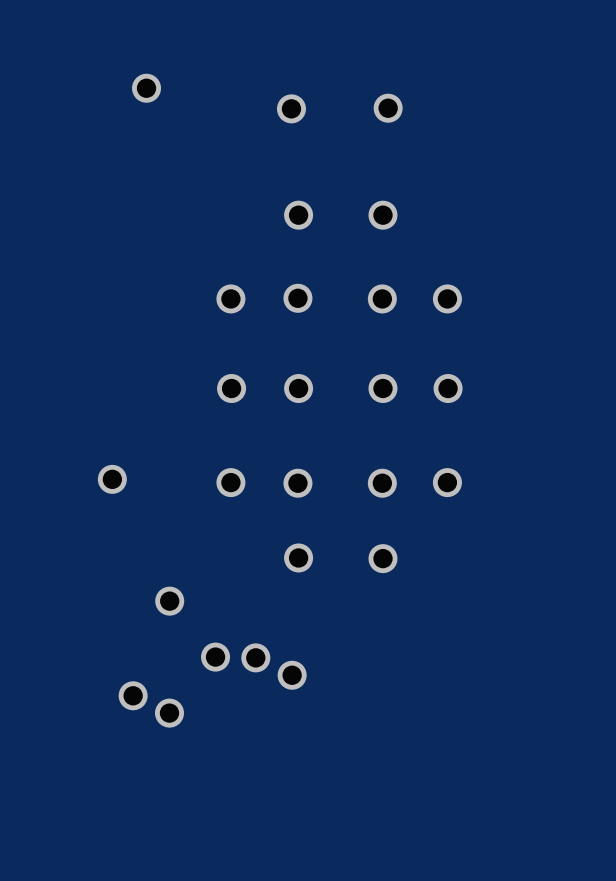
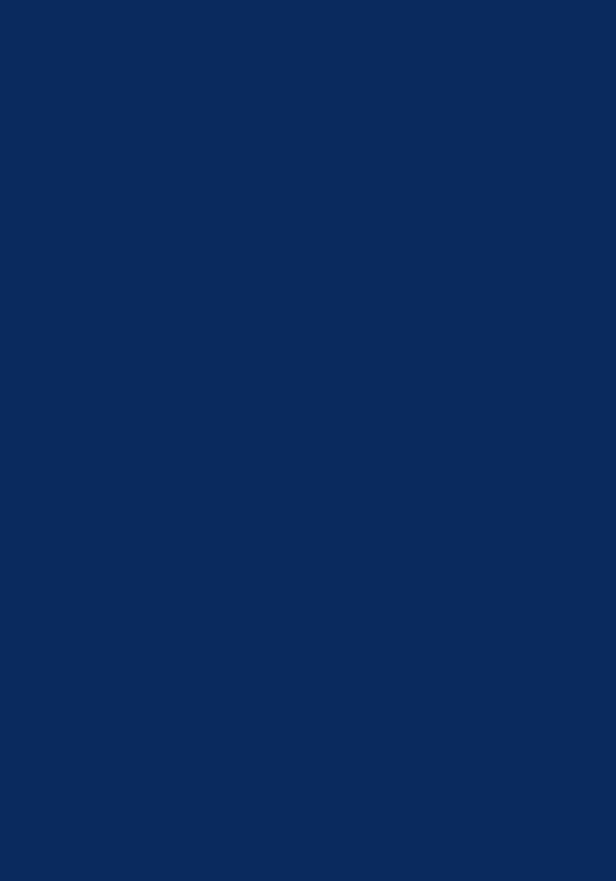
via: (146, 88) -> none
via: (291, 108) -> none
via: (388, 108) -> none
via: (298, 215) -> none
via: (382, 215) -> none
via: (230, 298) -> none
via: (297, 298) -> none
via: (382, 298) -> none
via: (447, 298) -> none
via: (231, 388) -> none
via: (298, 388) -> none
via: (382, 388) -> none
via: (448, 388) -> none
via: (112, 479) -> none
via: (230, 482) -> none
via: (447, 482) -> none
via: (297, 483) -> none
via: (382, 483) -> none
via: (298, 557) -> none
via: (382, 558) -> none
via: (169, 601) -> none
via: (215, 657) -> none
via: (255, 657) -> none
via: (292, 675) -> none
via: (133, 695) -> none
via: (169, 713) -> none

